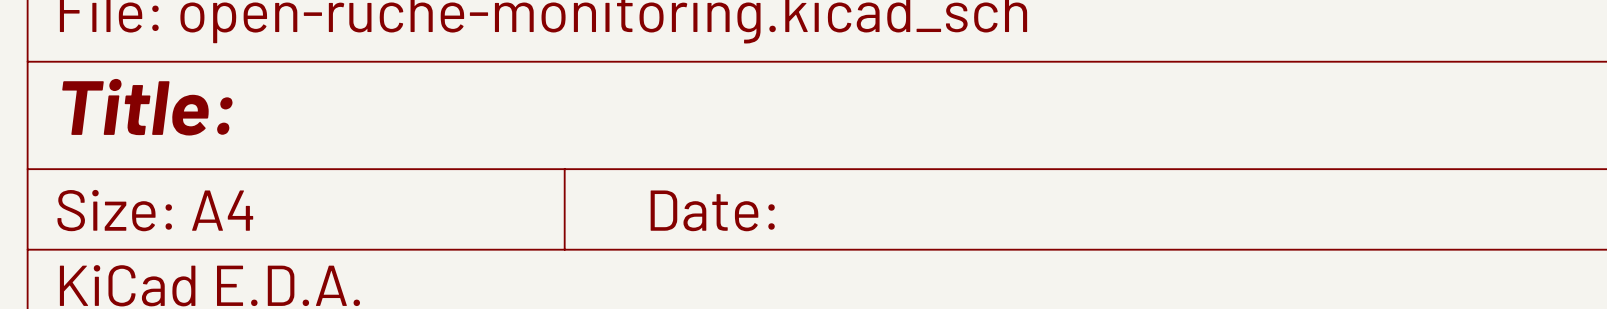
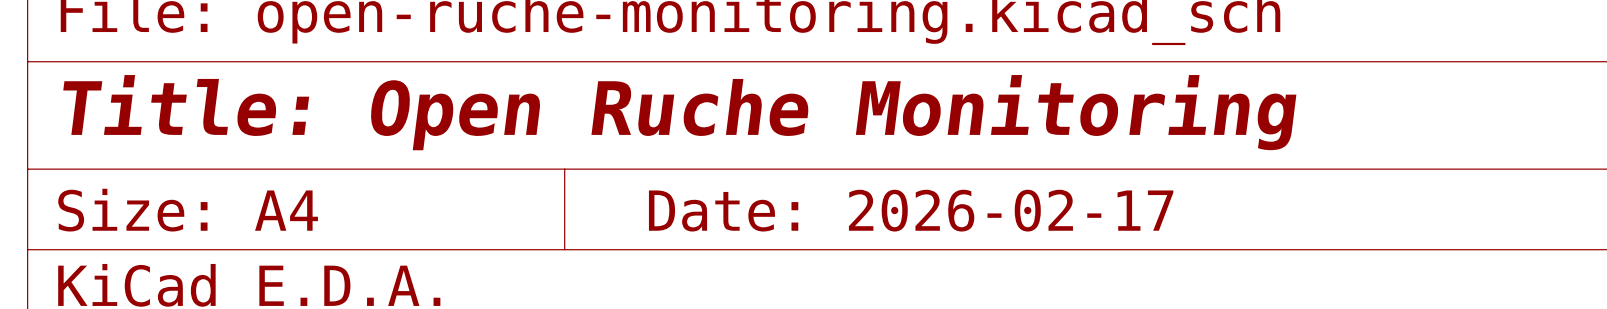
title block: Title: (147, 107) -> Title: Open Ruche Monitoring (679, 112)
title block: Date: (712, 210) -> Date: 2026-02-17 (911, 210)

